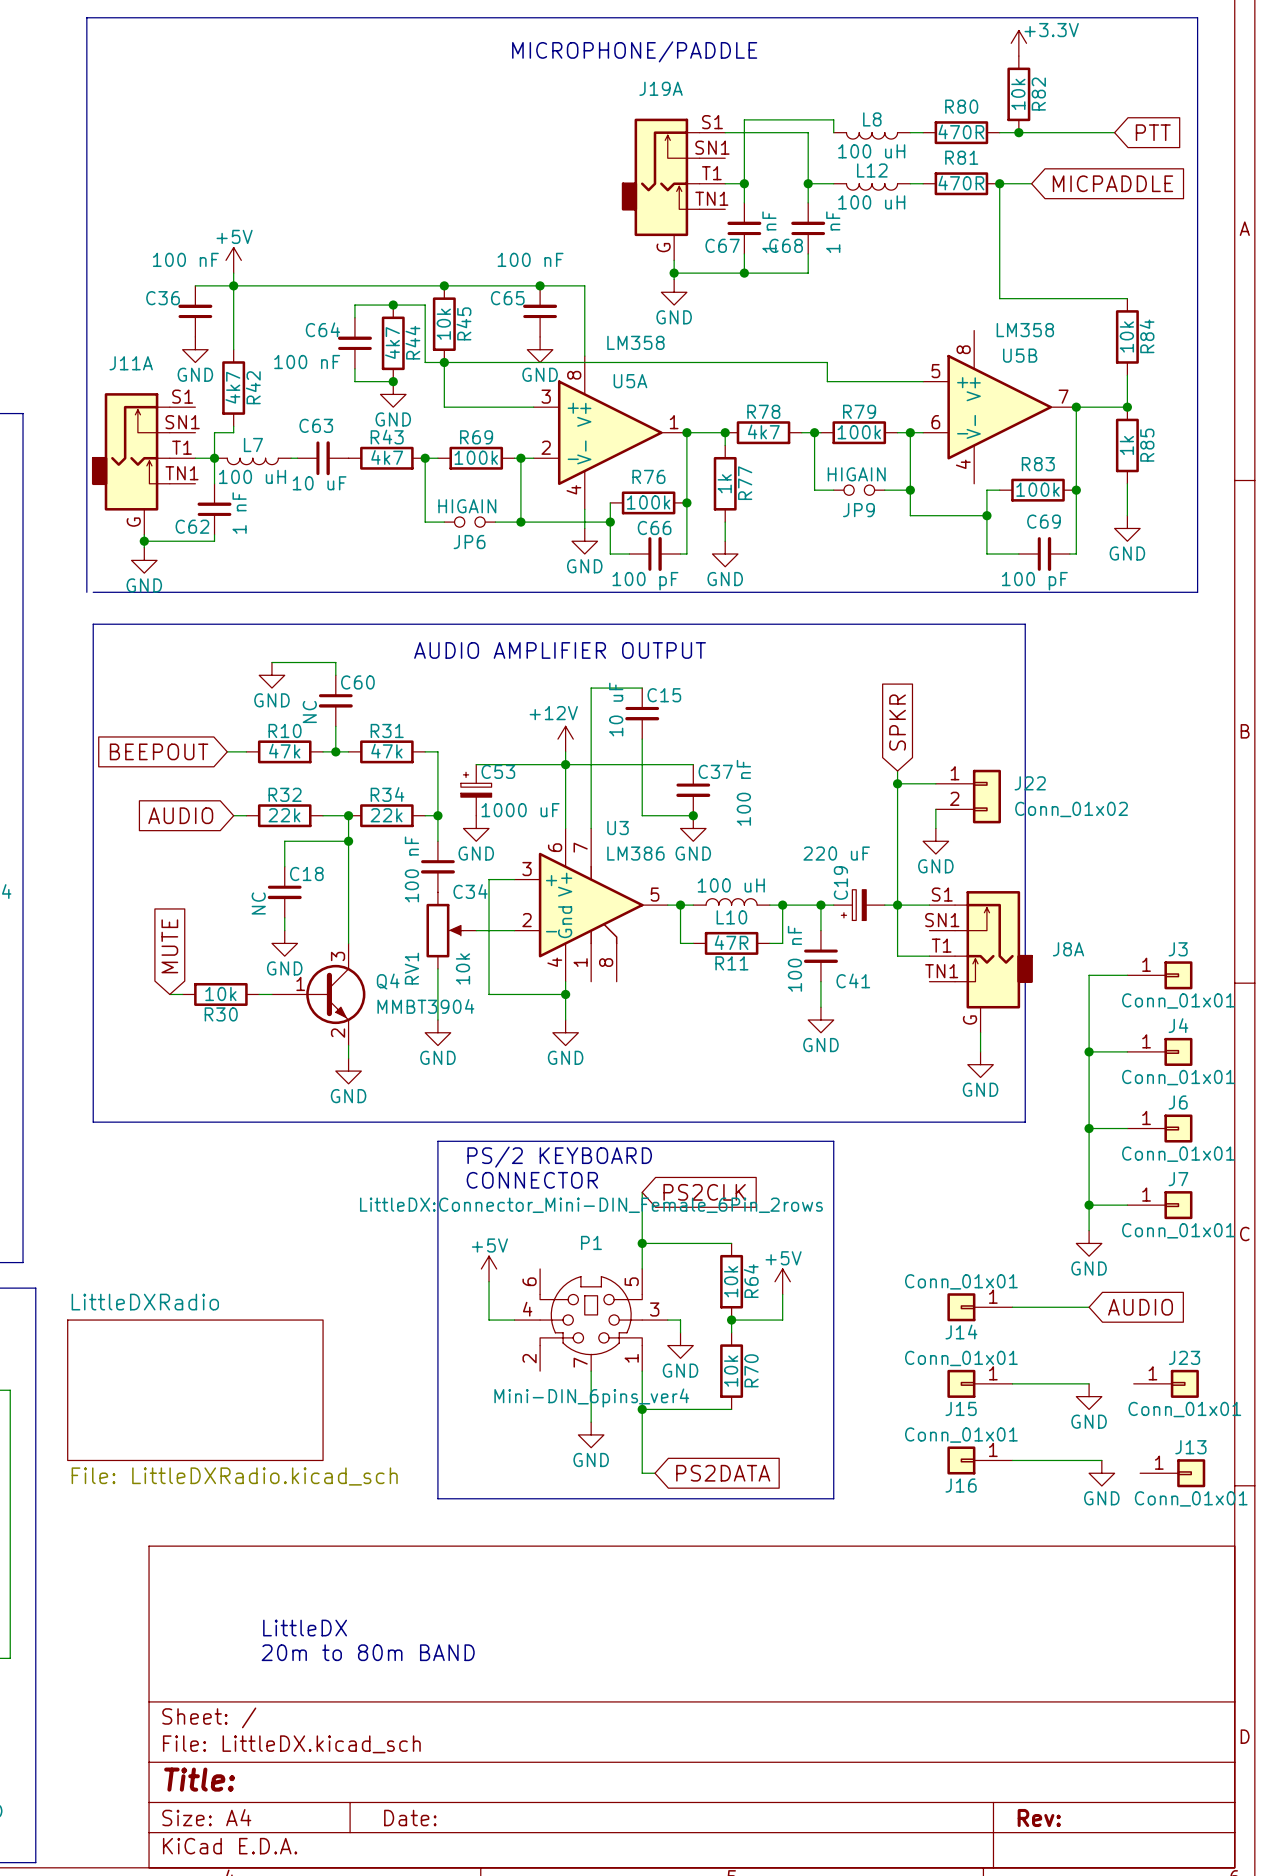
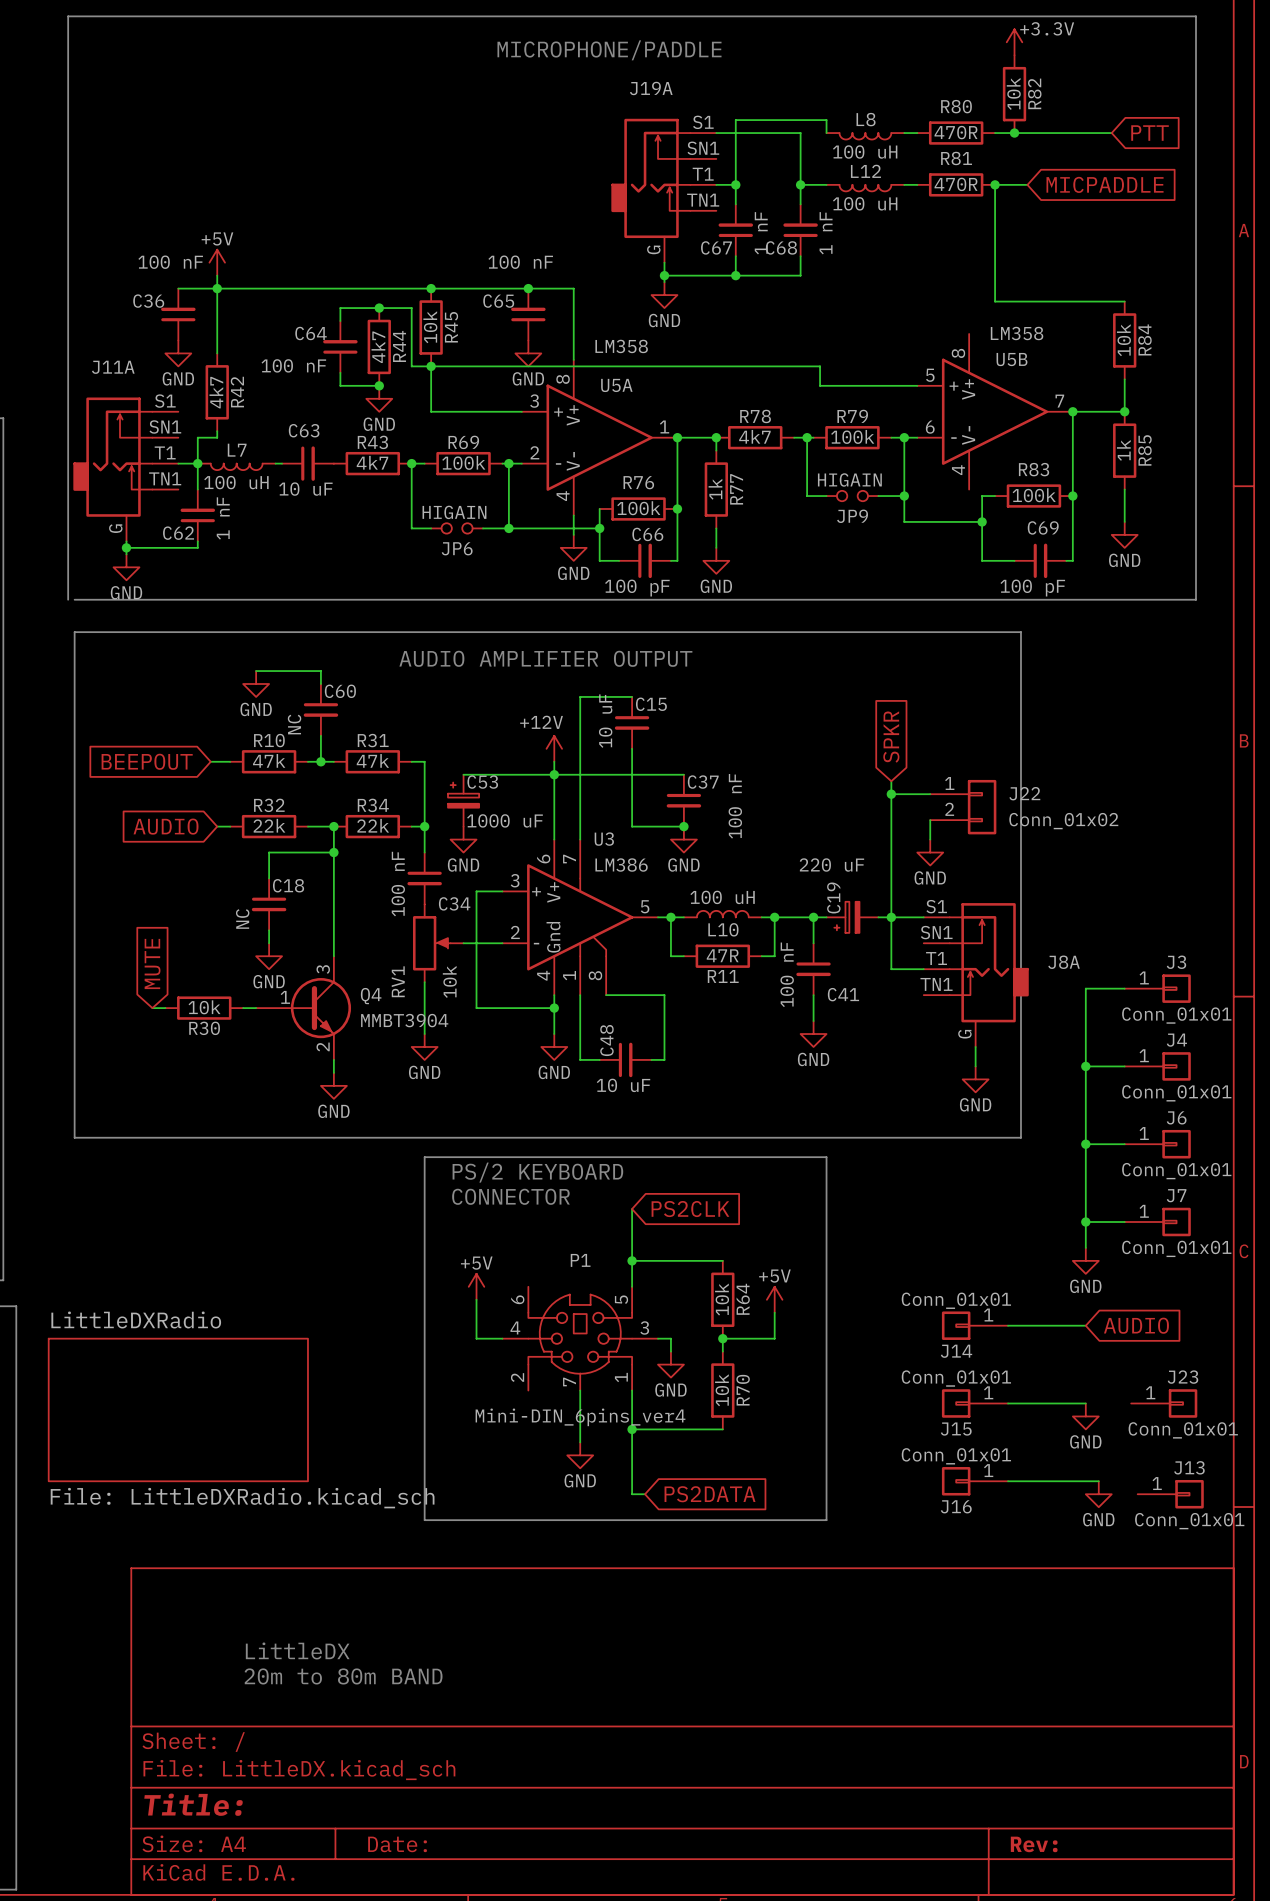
wire: none -> (580, 995) (580, 1059) (599, 1059)
wire: none -> (606, 995) (664, 995) (664, 1059) (651, 1059)
C48: none -> 10 uF (625, 1059)
P1 text: LittleDX:Connector_Mini-DIN_Female_6Pin_2rows (591, 1205) -> none

